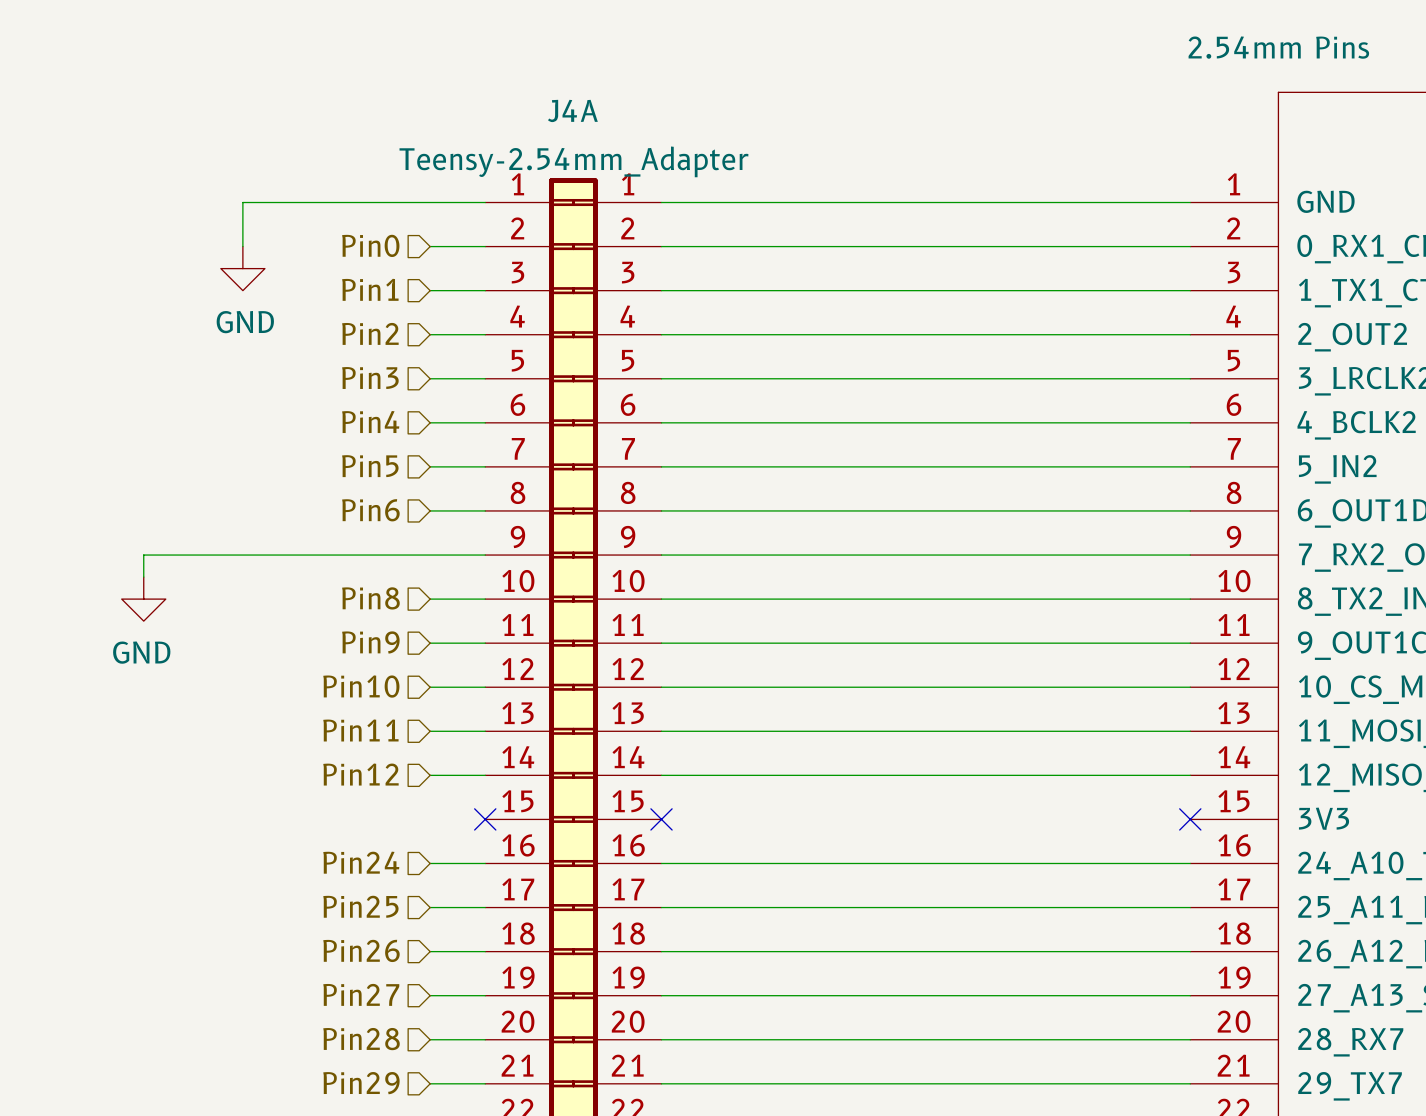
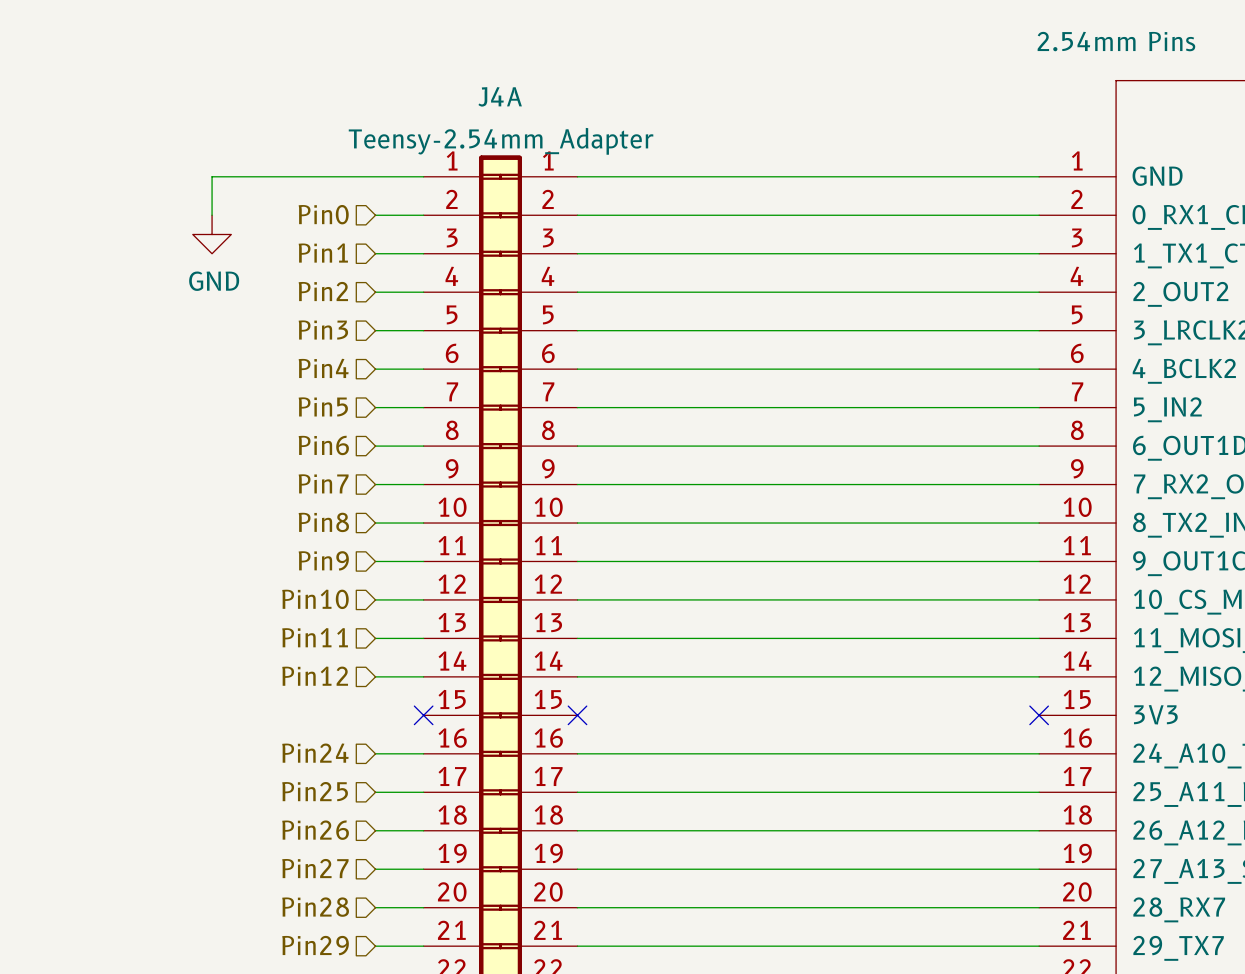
hierarchical label: none -> Pin7 (323, 483)
wire: (430, 555) (143, 555) (143, 577) -> none
power symbol: GND (143, 599) -> none

